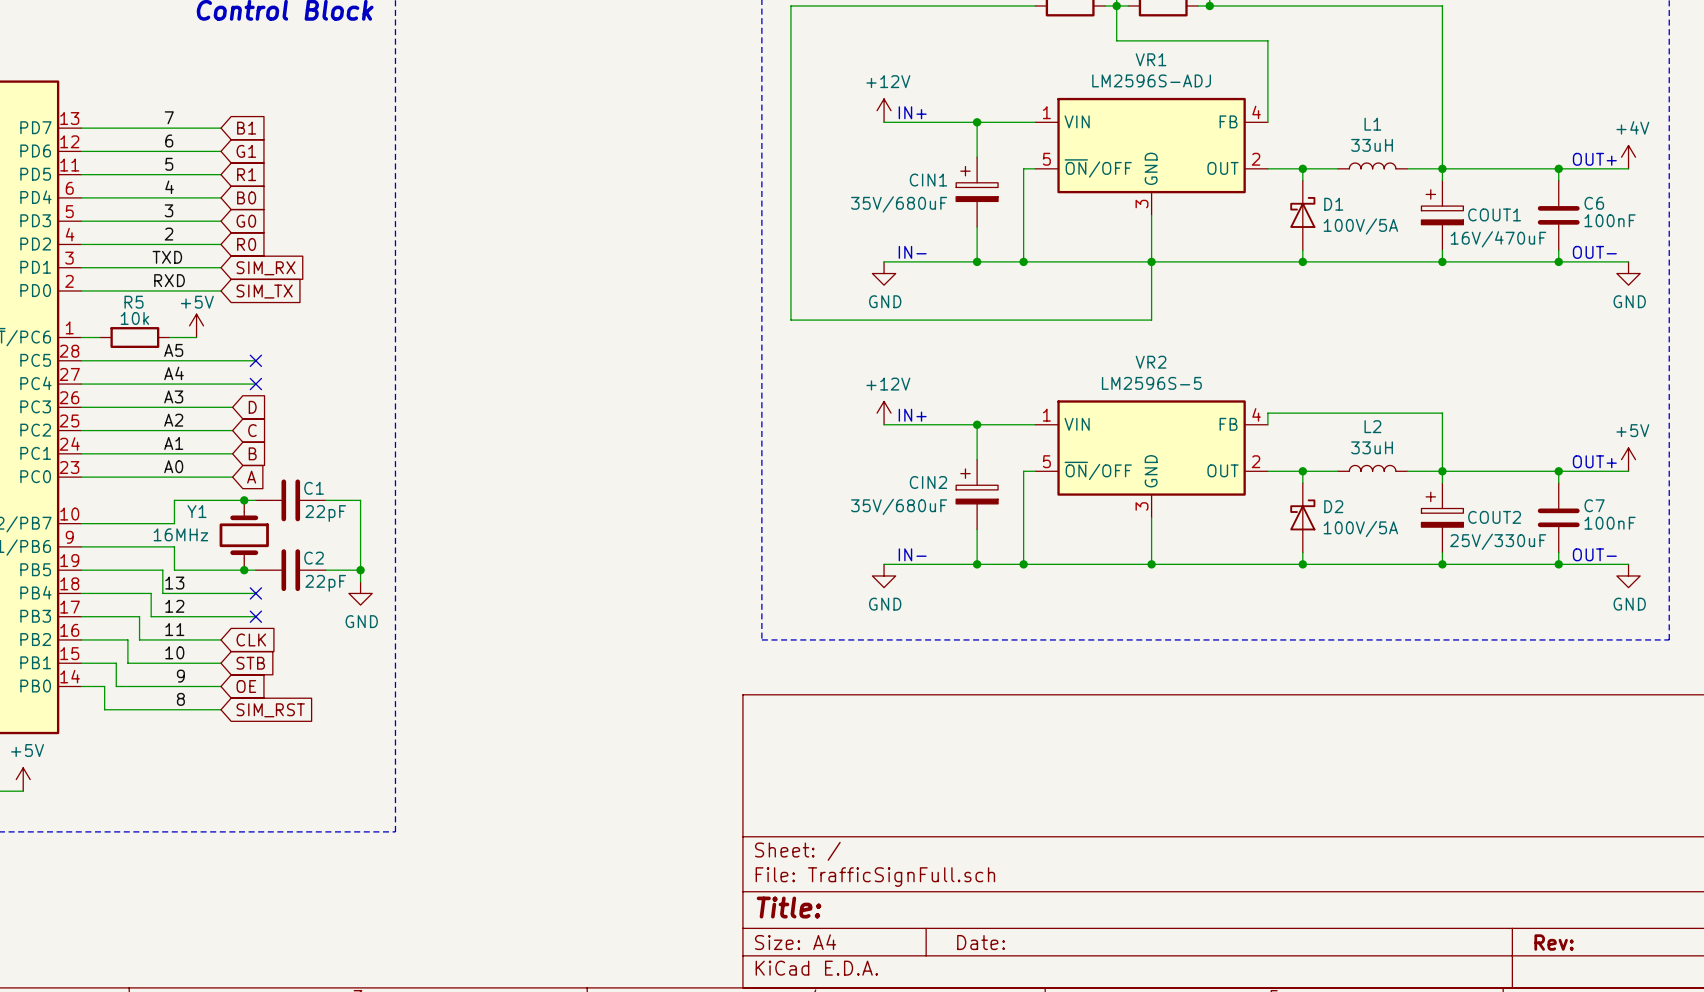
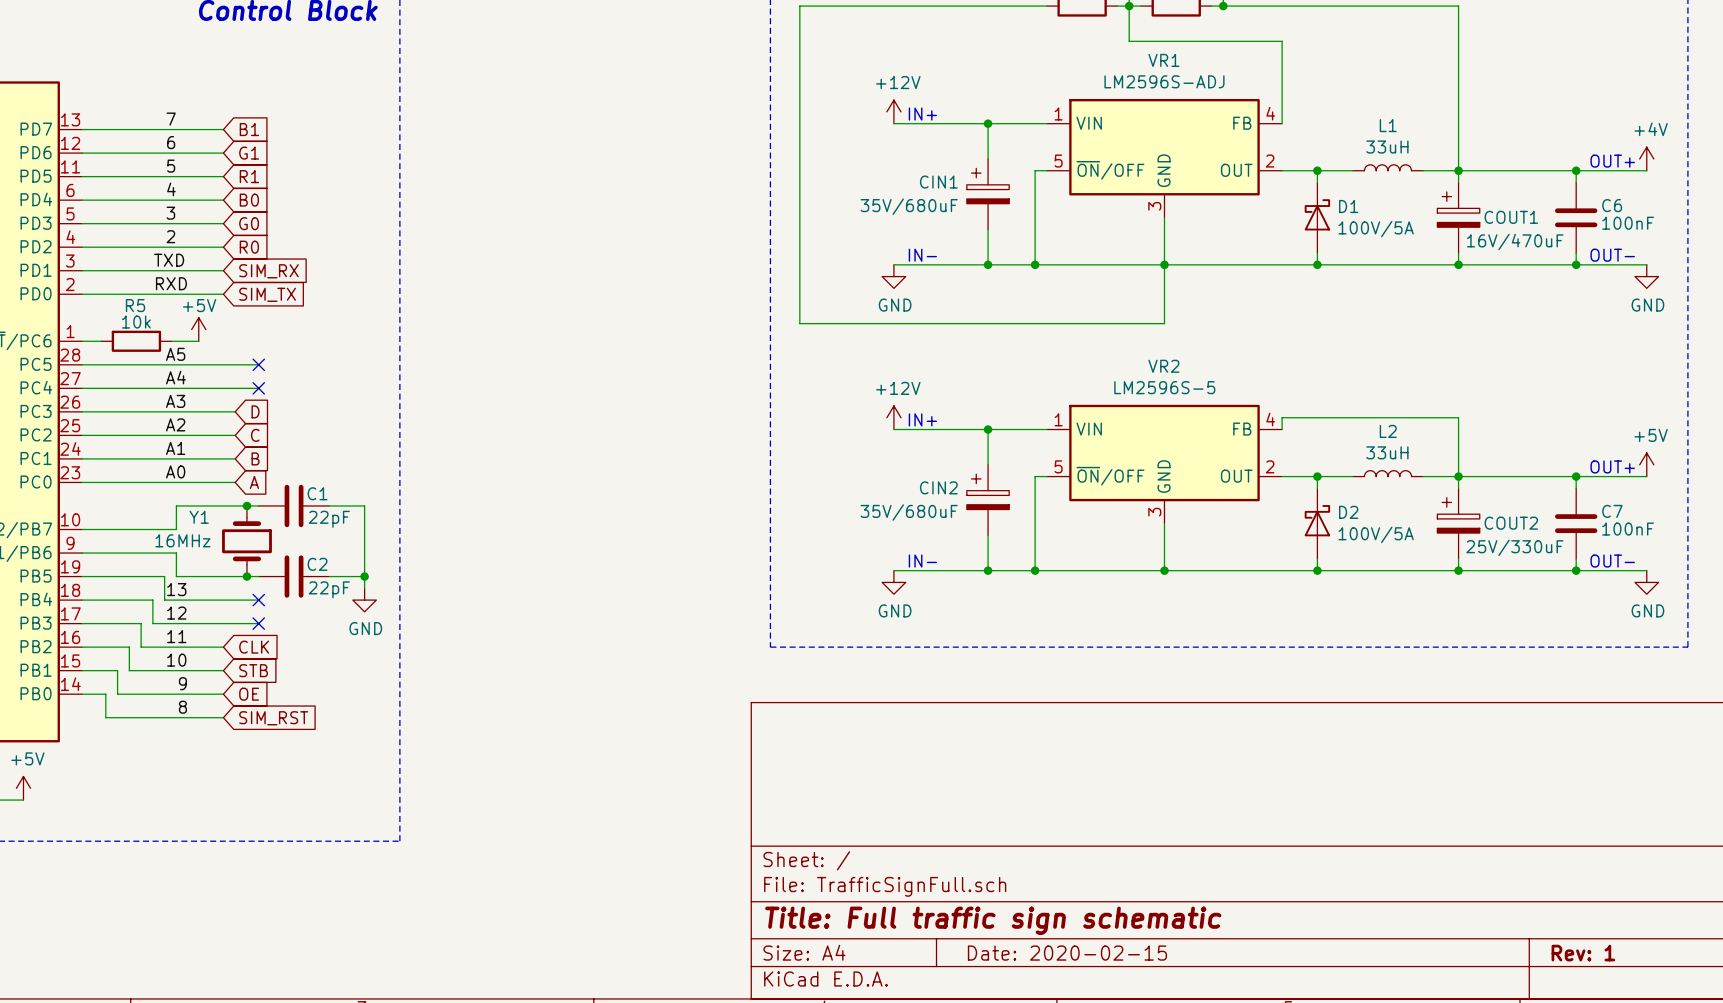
title block: Title: (789, 907) -> Title: Full traffic sign schematic (993, 920)
title block: Date: (981, 942) -> Date: 2020-02-15 (1067, 953)
title block: Rev: (1554, 942) -> Rev: 1 (1583, 953)

